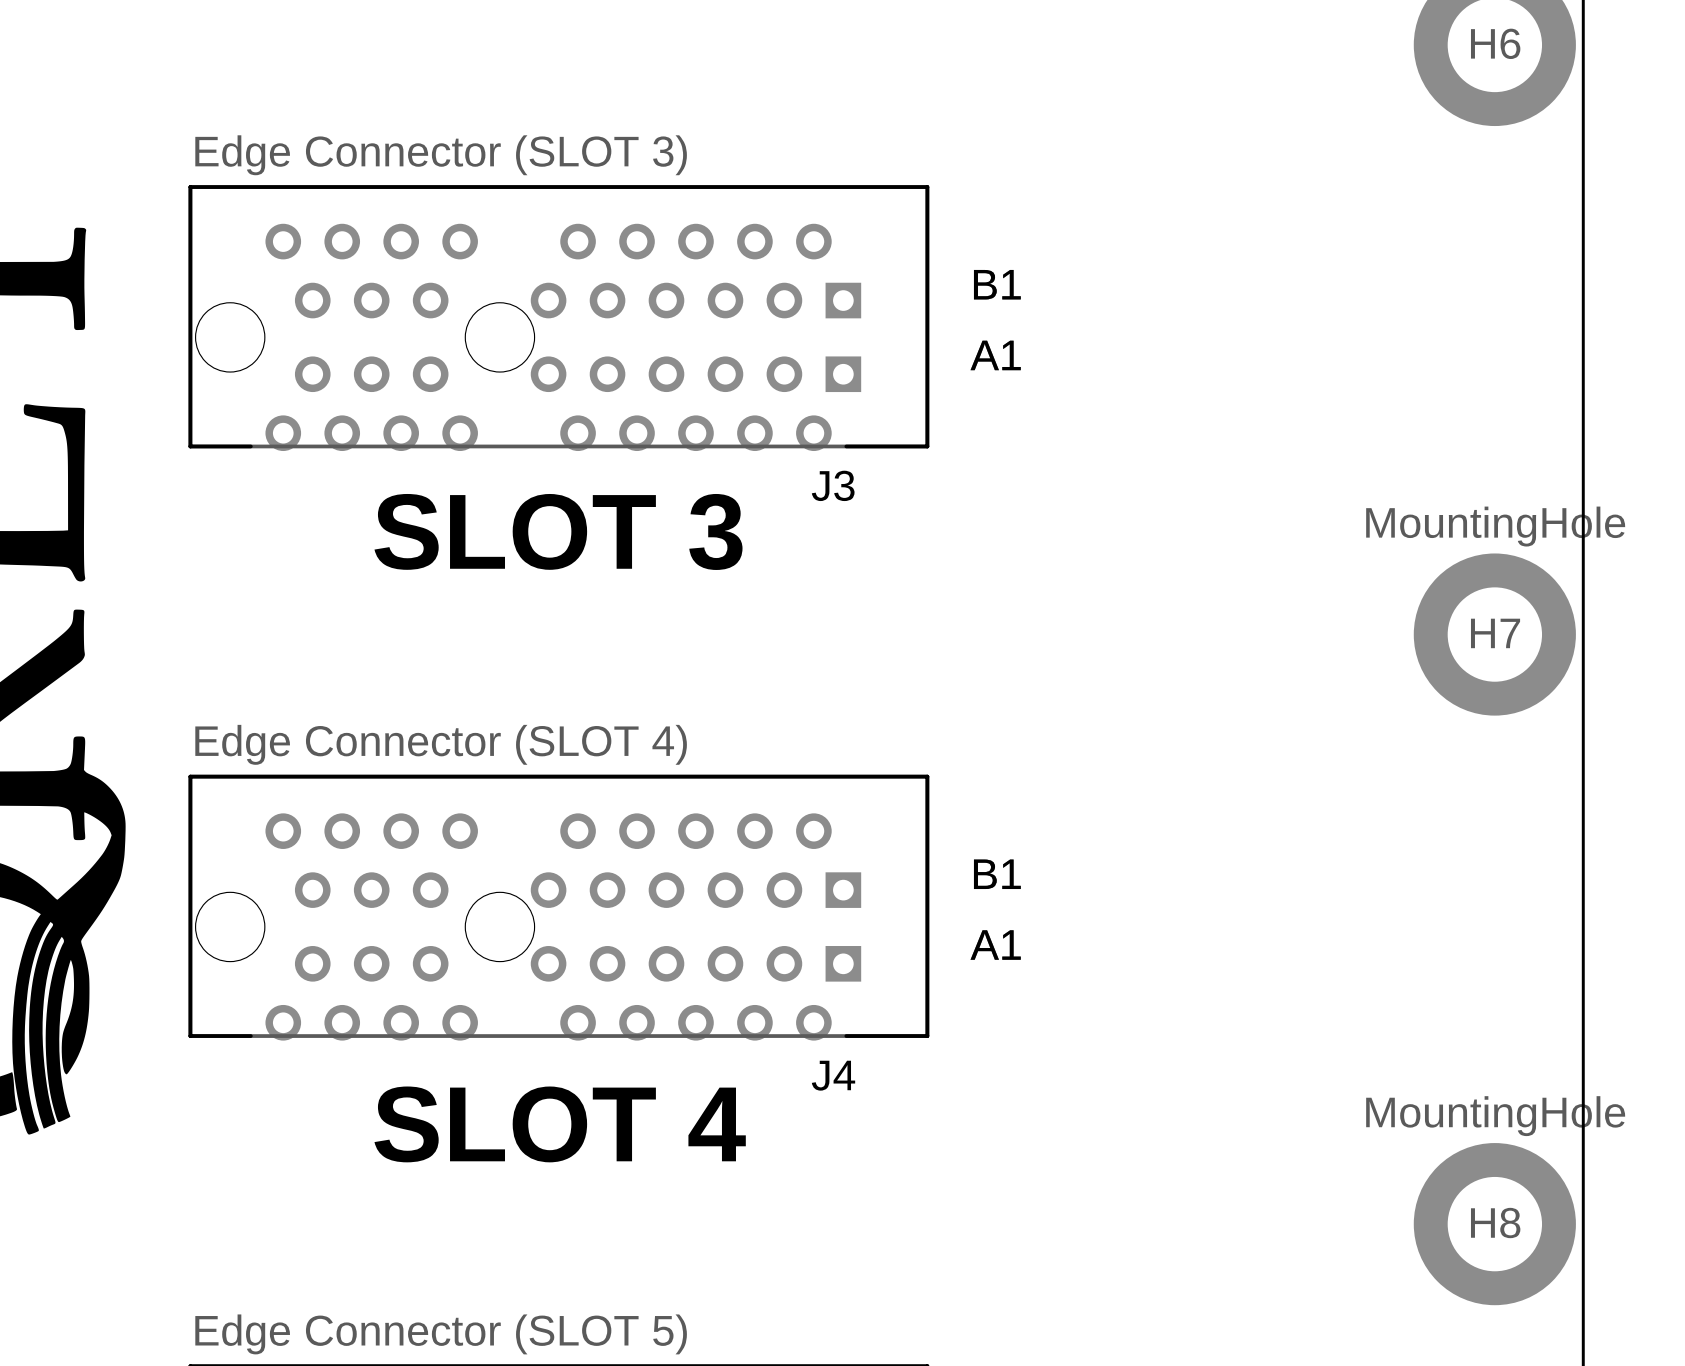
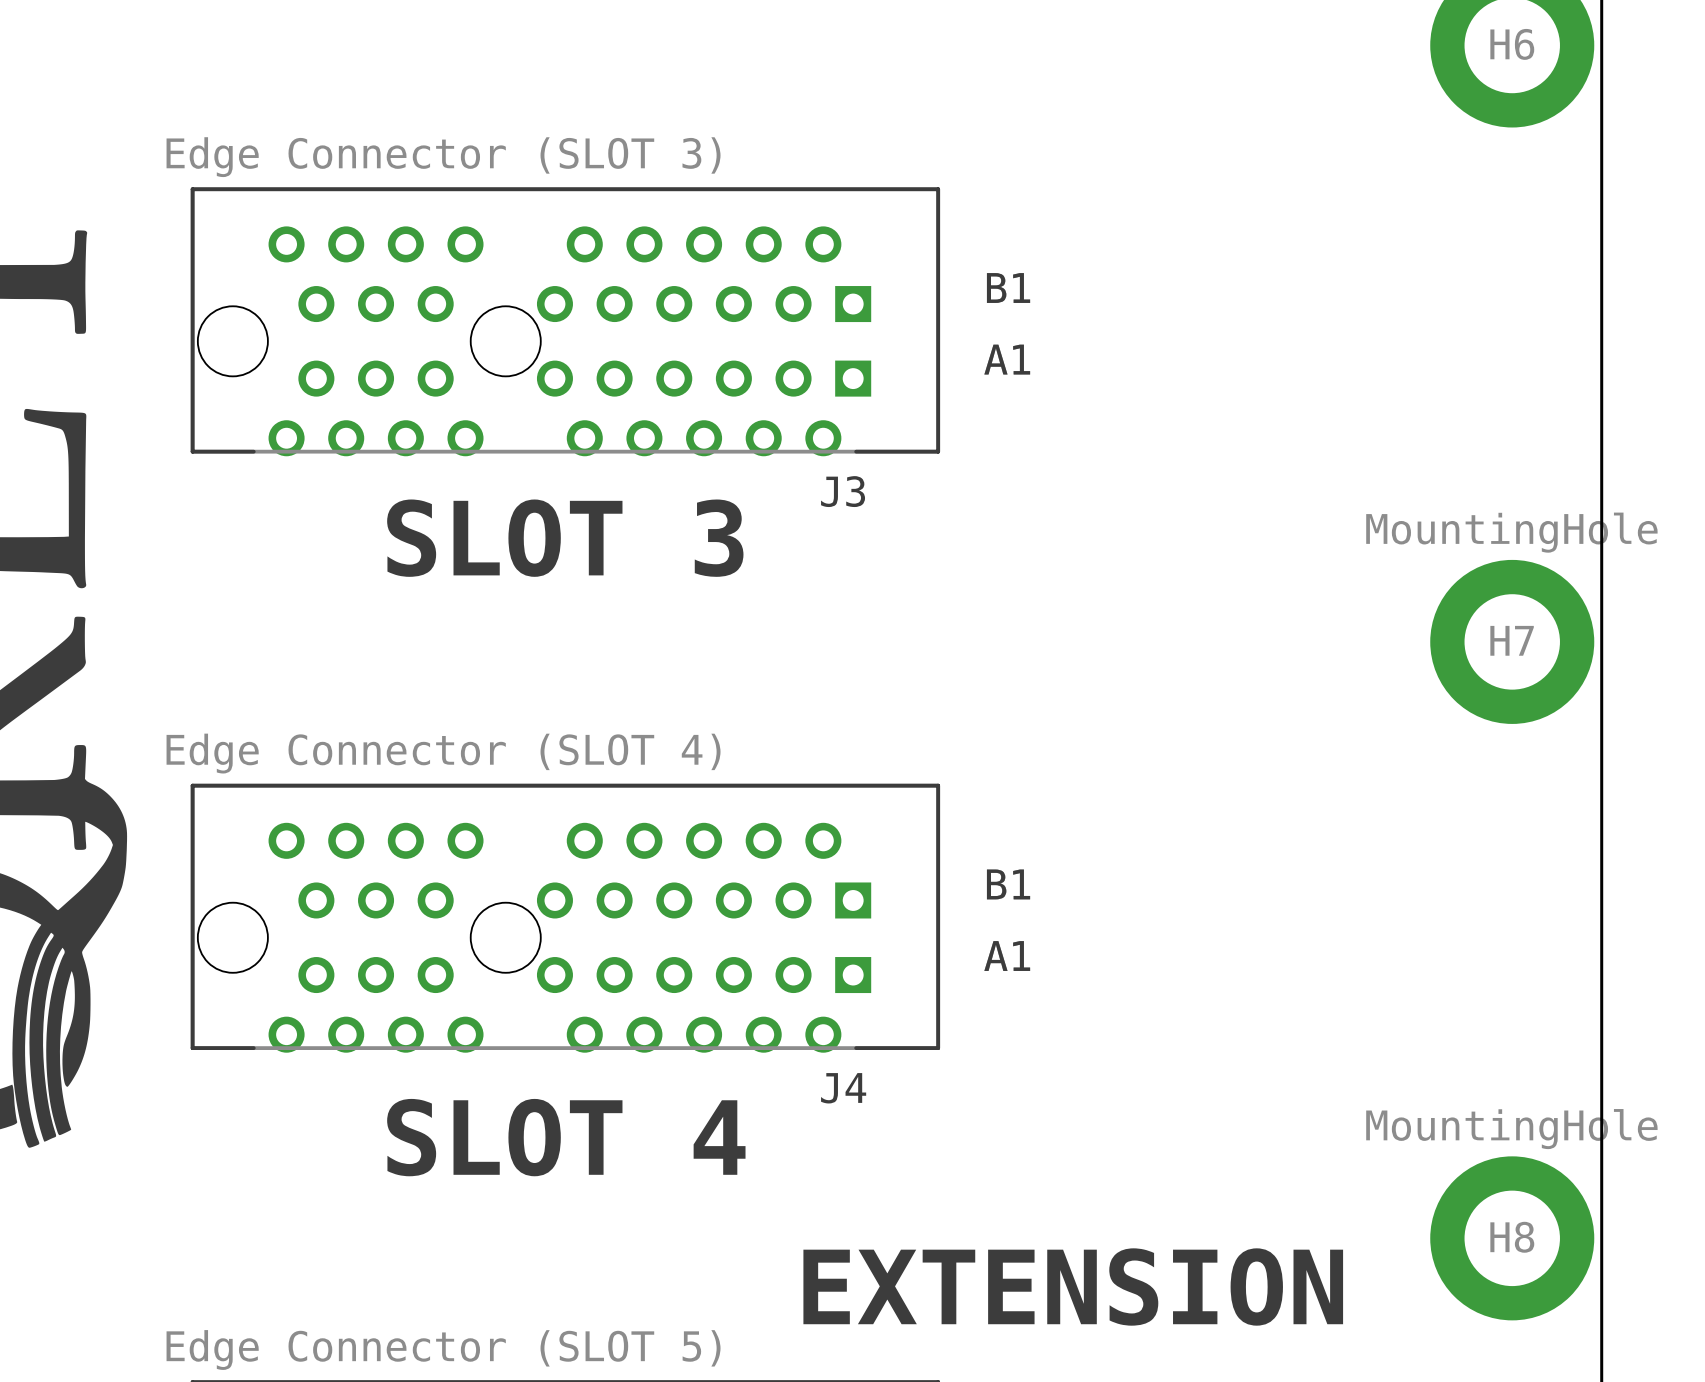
text: none -> EXTENSION (1073, 1287)

